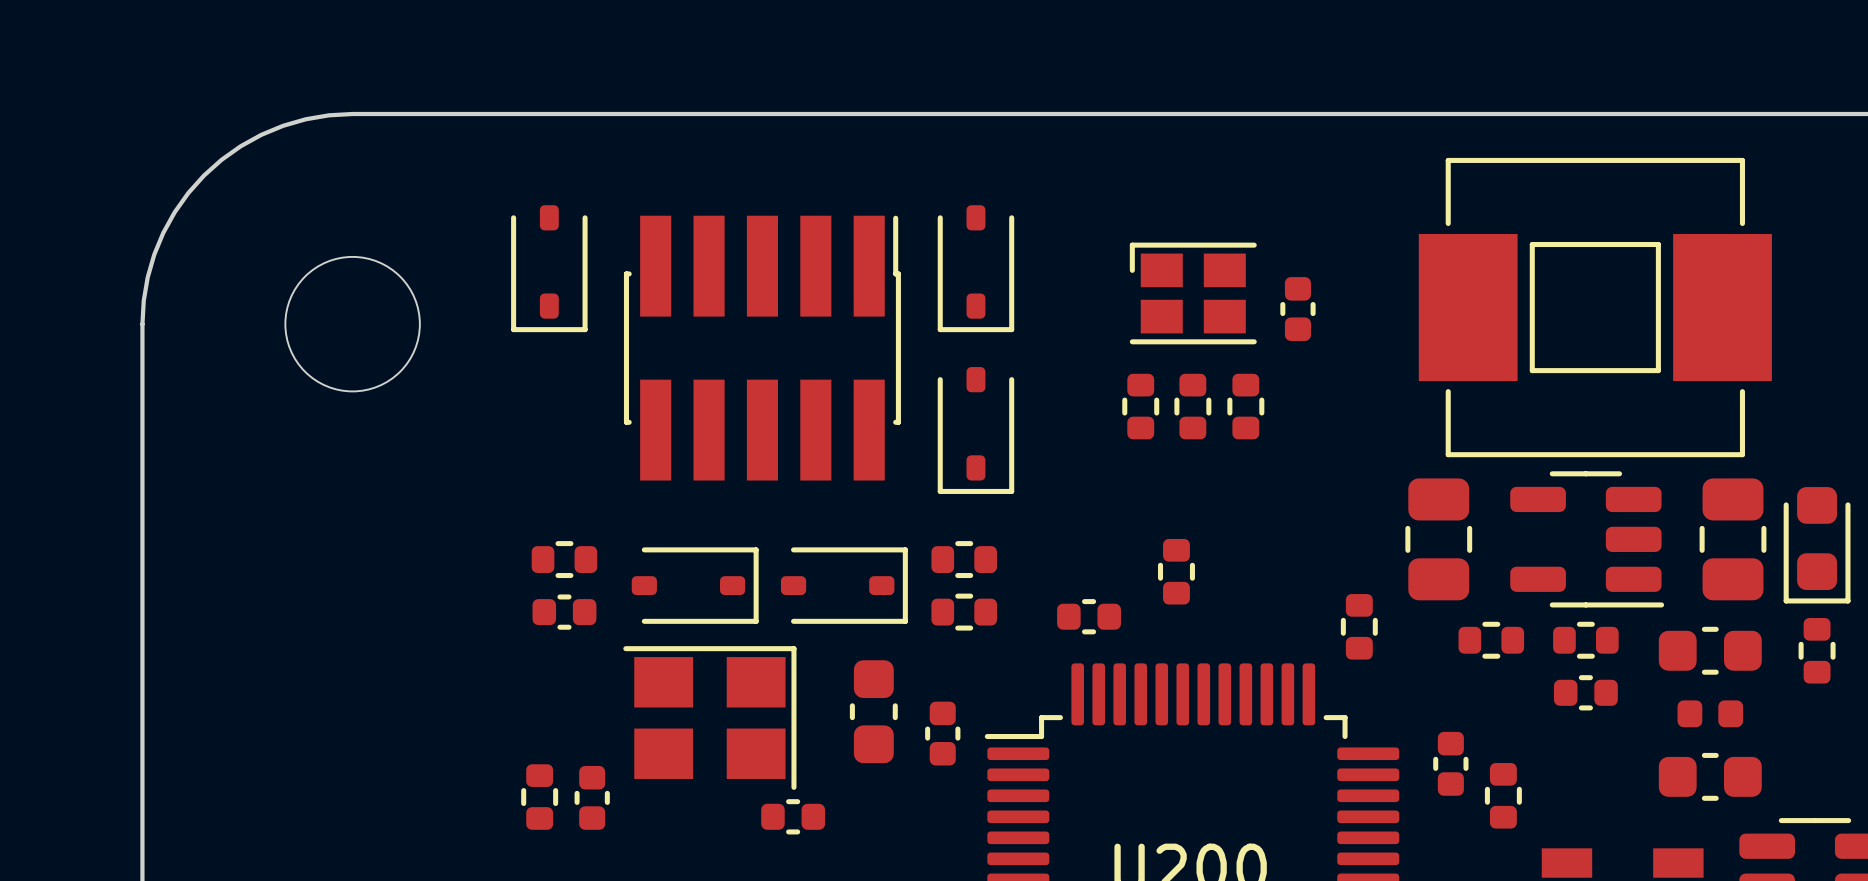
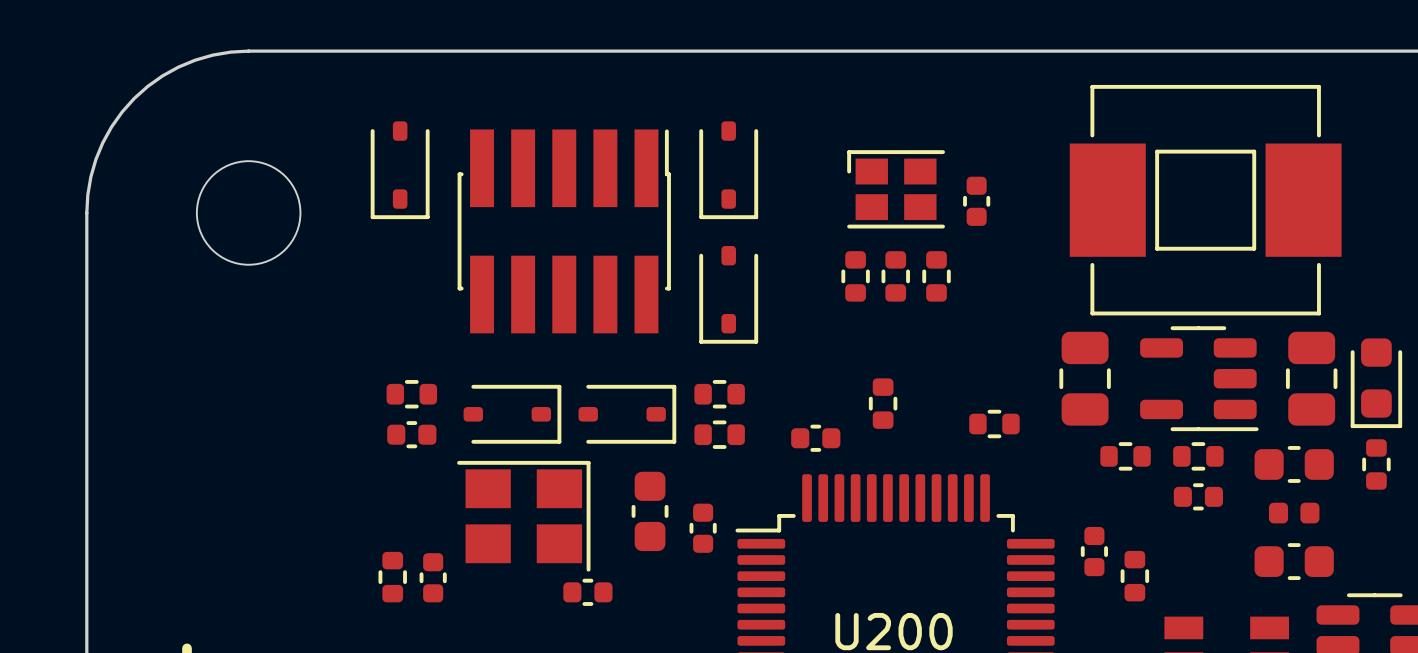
part rotation: 0° (1359, 626) -> 90° clockwise (994, 424)
part position: (1359, 626) -> (994, 424)

